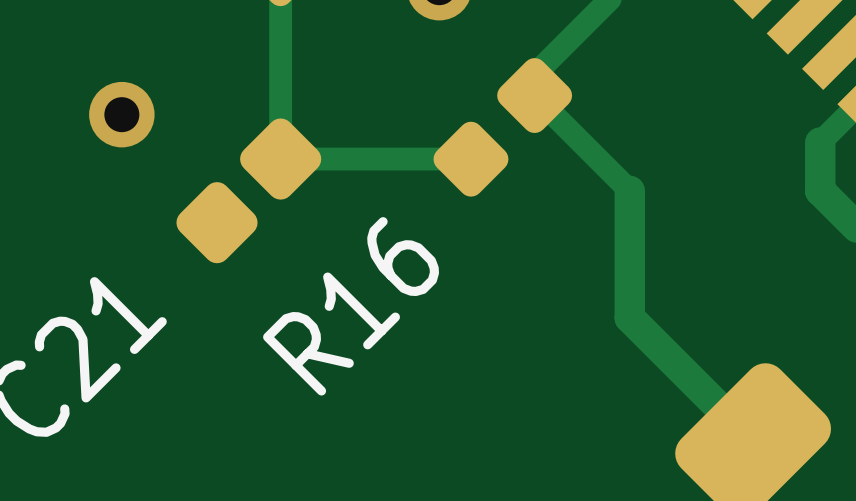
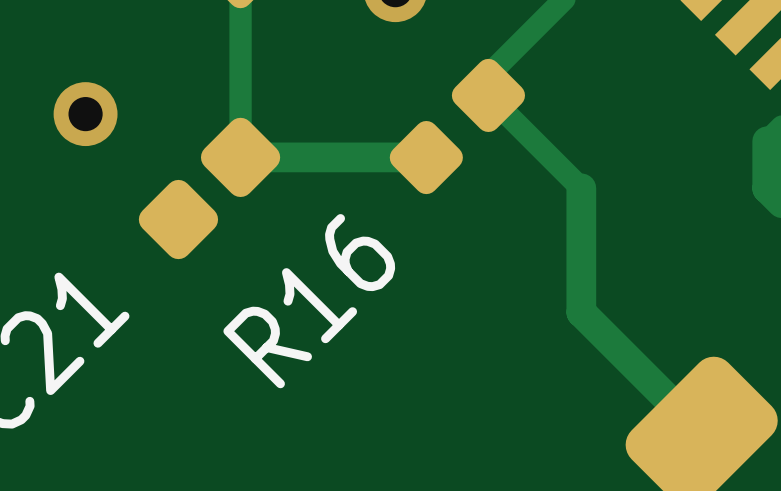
track width: thin (280, 159) (470, 159) -> thick (240, 157) (426, 157)

